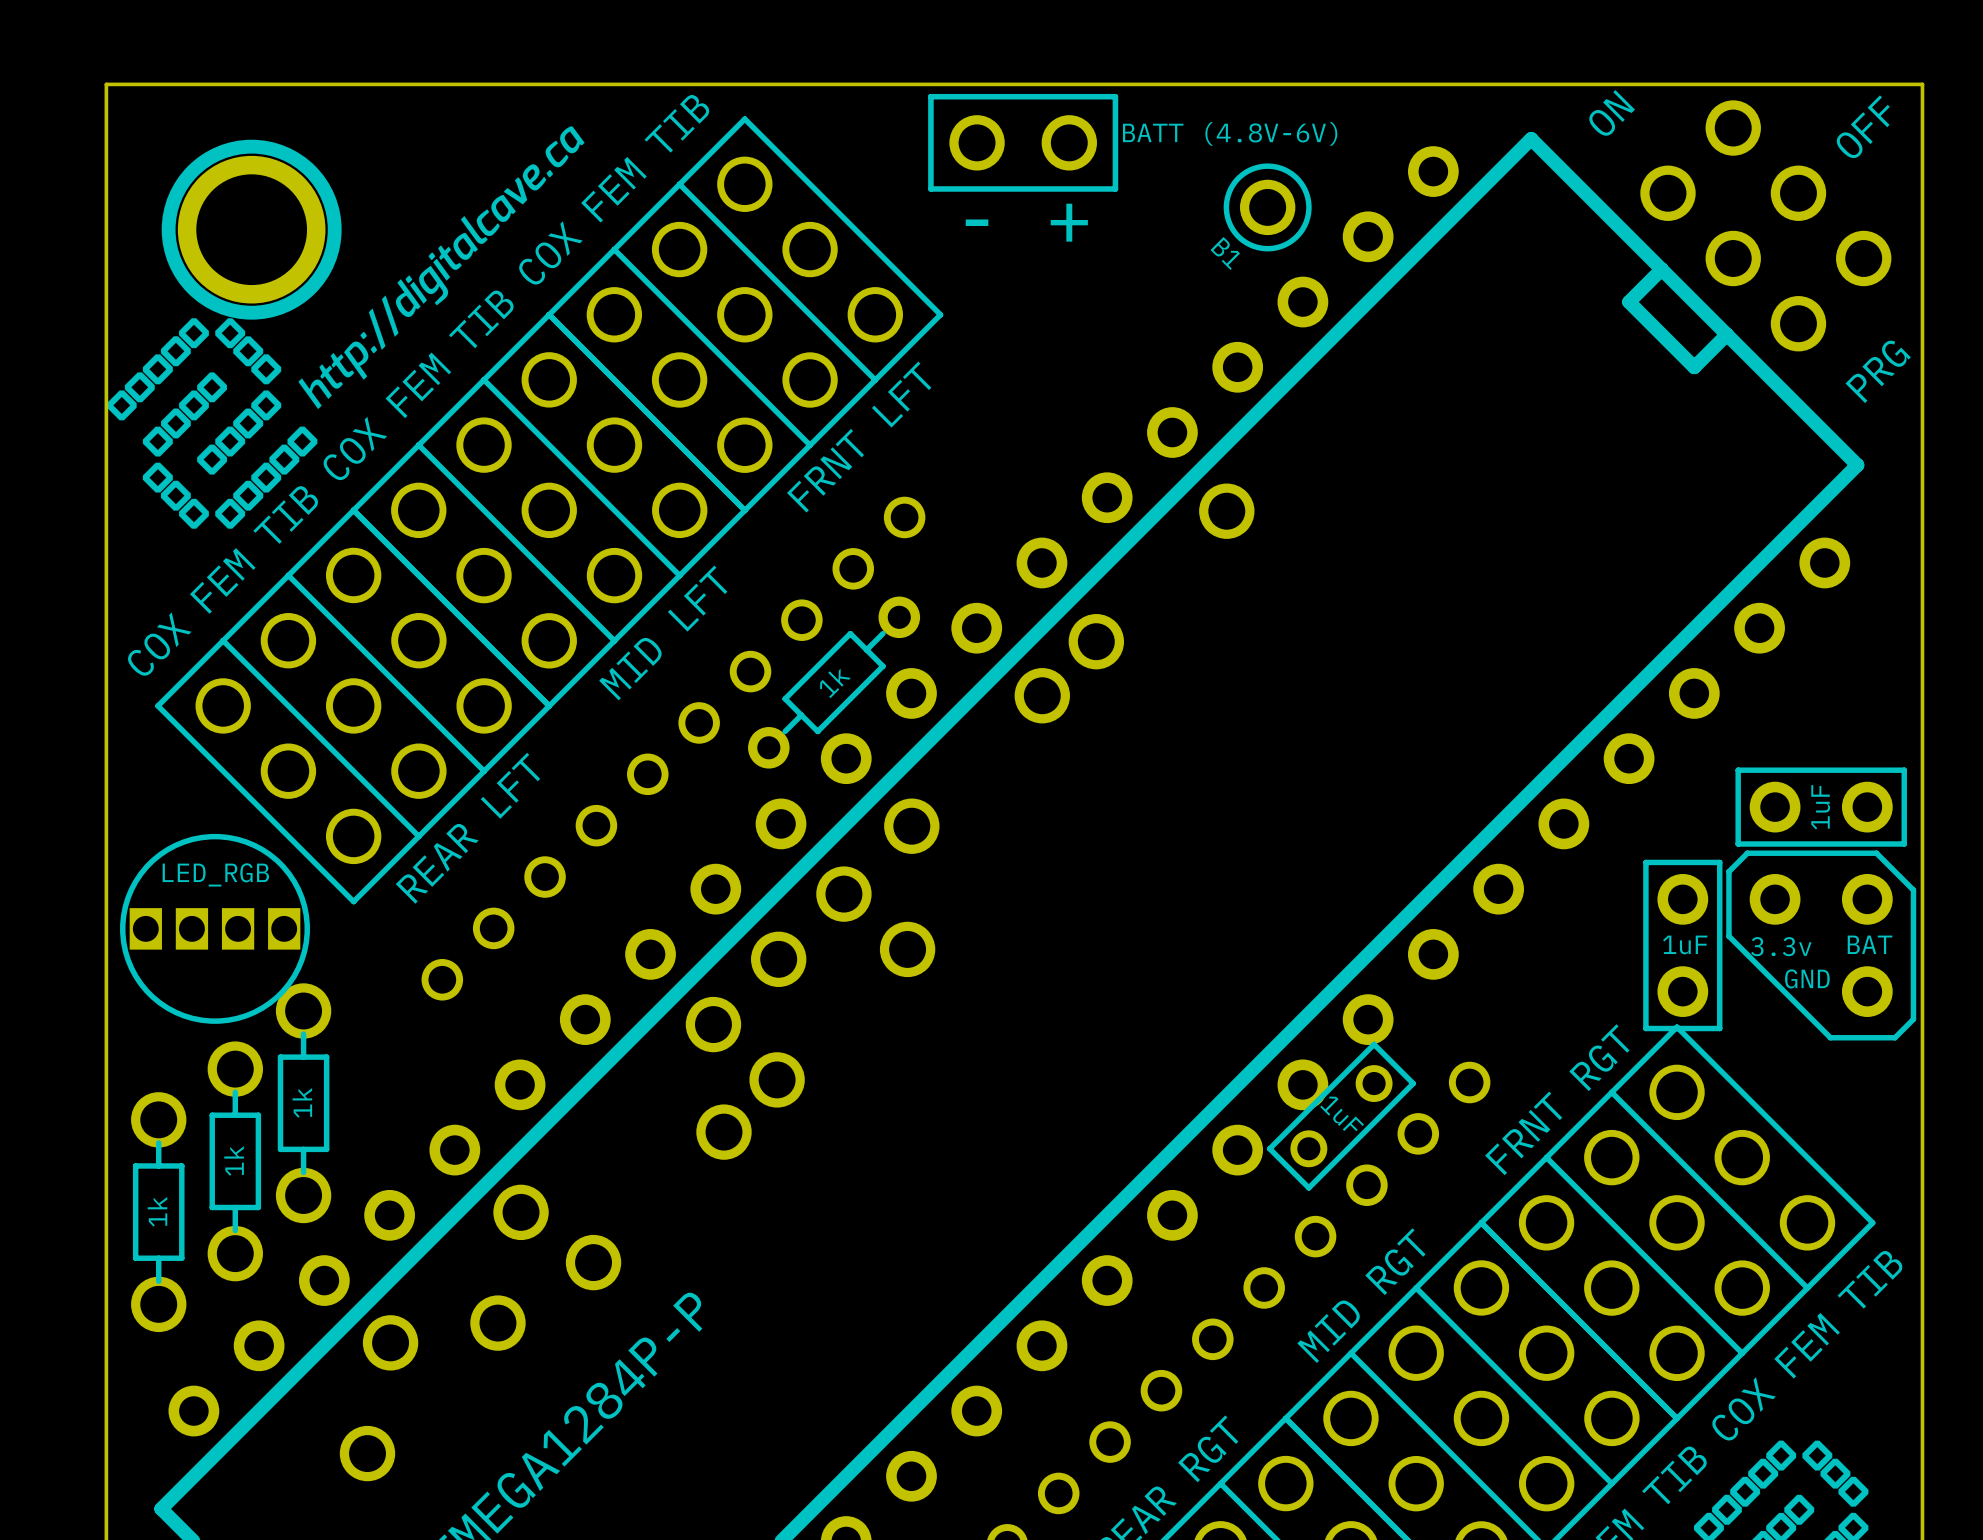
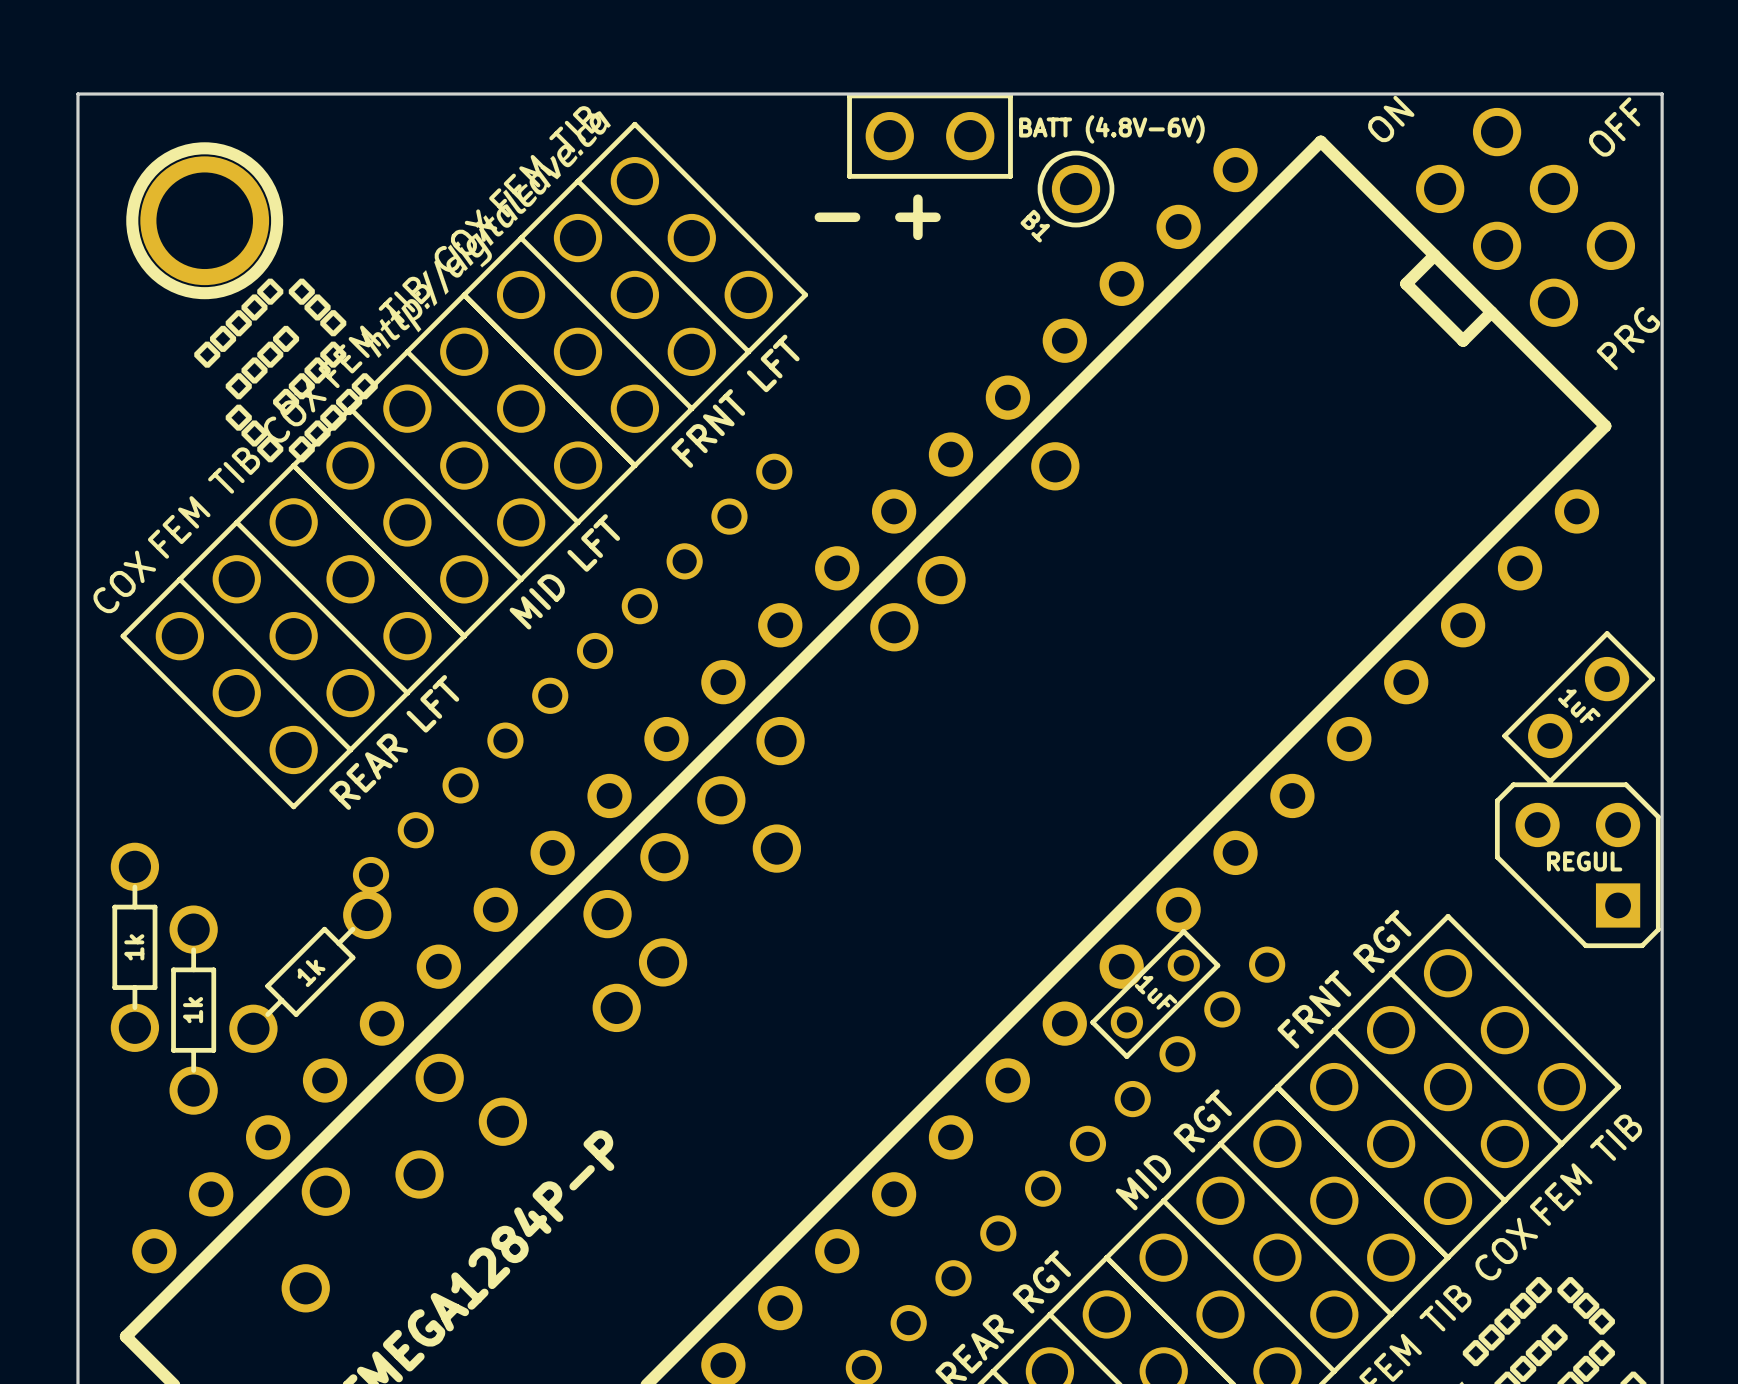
part position: (1023, 142) -> (930, 136)
part position: (1267, 207) -> (1076, 189)
text position: B1 (1225, 253) -> B1 (1035, 226)
drawing position: (345, 327) -> (402, 286)
part: 1k (834, 682) -> none
part rotation: 0° (1821, 807) -> 45° counterclockwise (1578, 707)
part footprint: [1726, 850, 1917, 1041] -> [1494, 782, 1661, 949]
part: LED_RGB (215, 928) -> none
text: BAT (1870, 944) -> none
part: 1uF (1682, 945) -> none
text: 3.3v (1781, 946) -> none
part value: none -> REGUL (1584, 861)
text: GND (1807, 978) -> none
part: none -> 1k (134, 947)
part: none -> 1k (310, 971)
part: 1k (303, 1103) -> none
part position: (235, 1161) -> (193, 1010)
part: 1k (158, 1212) -> none

